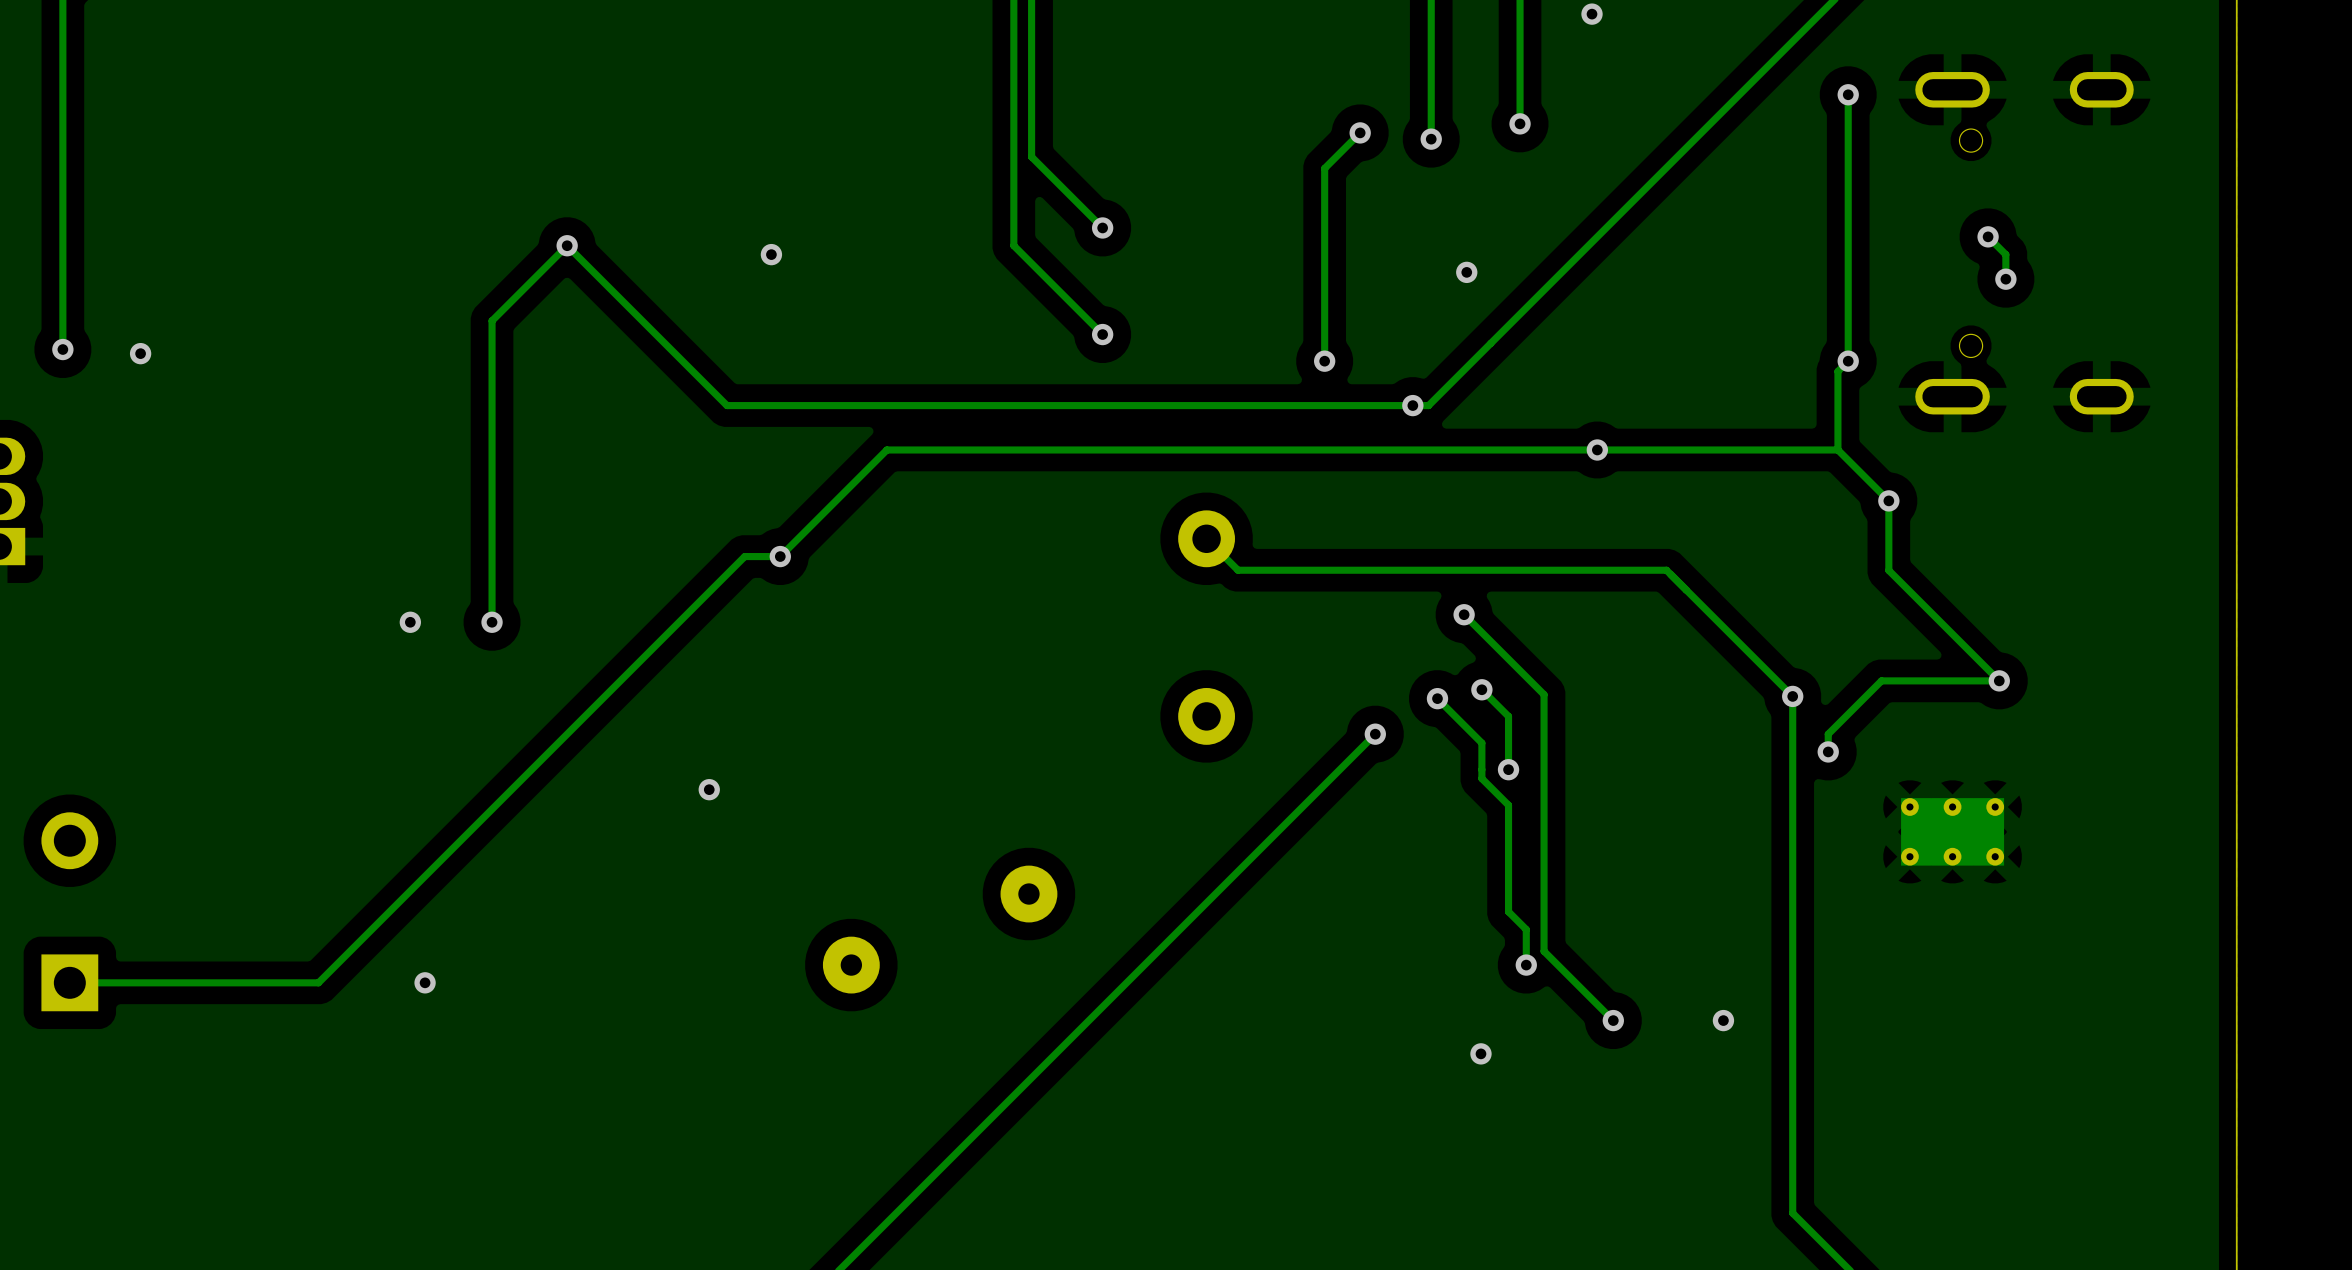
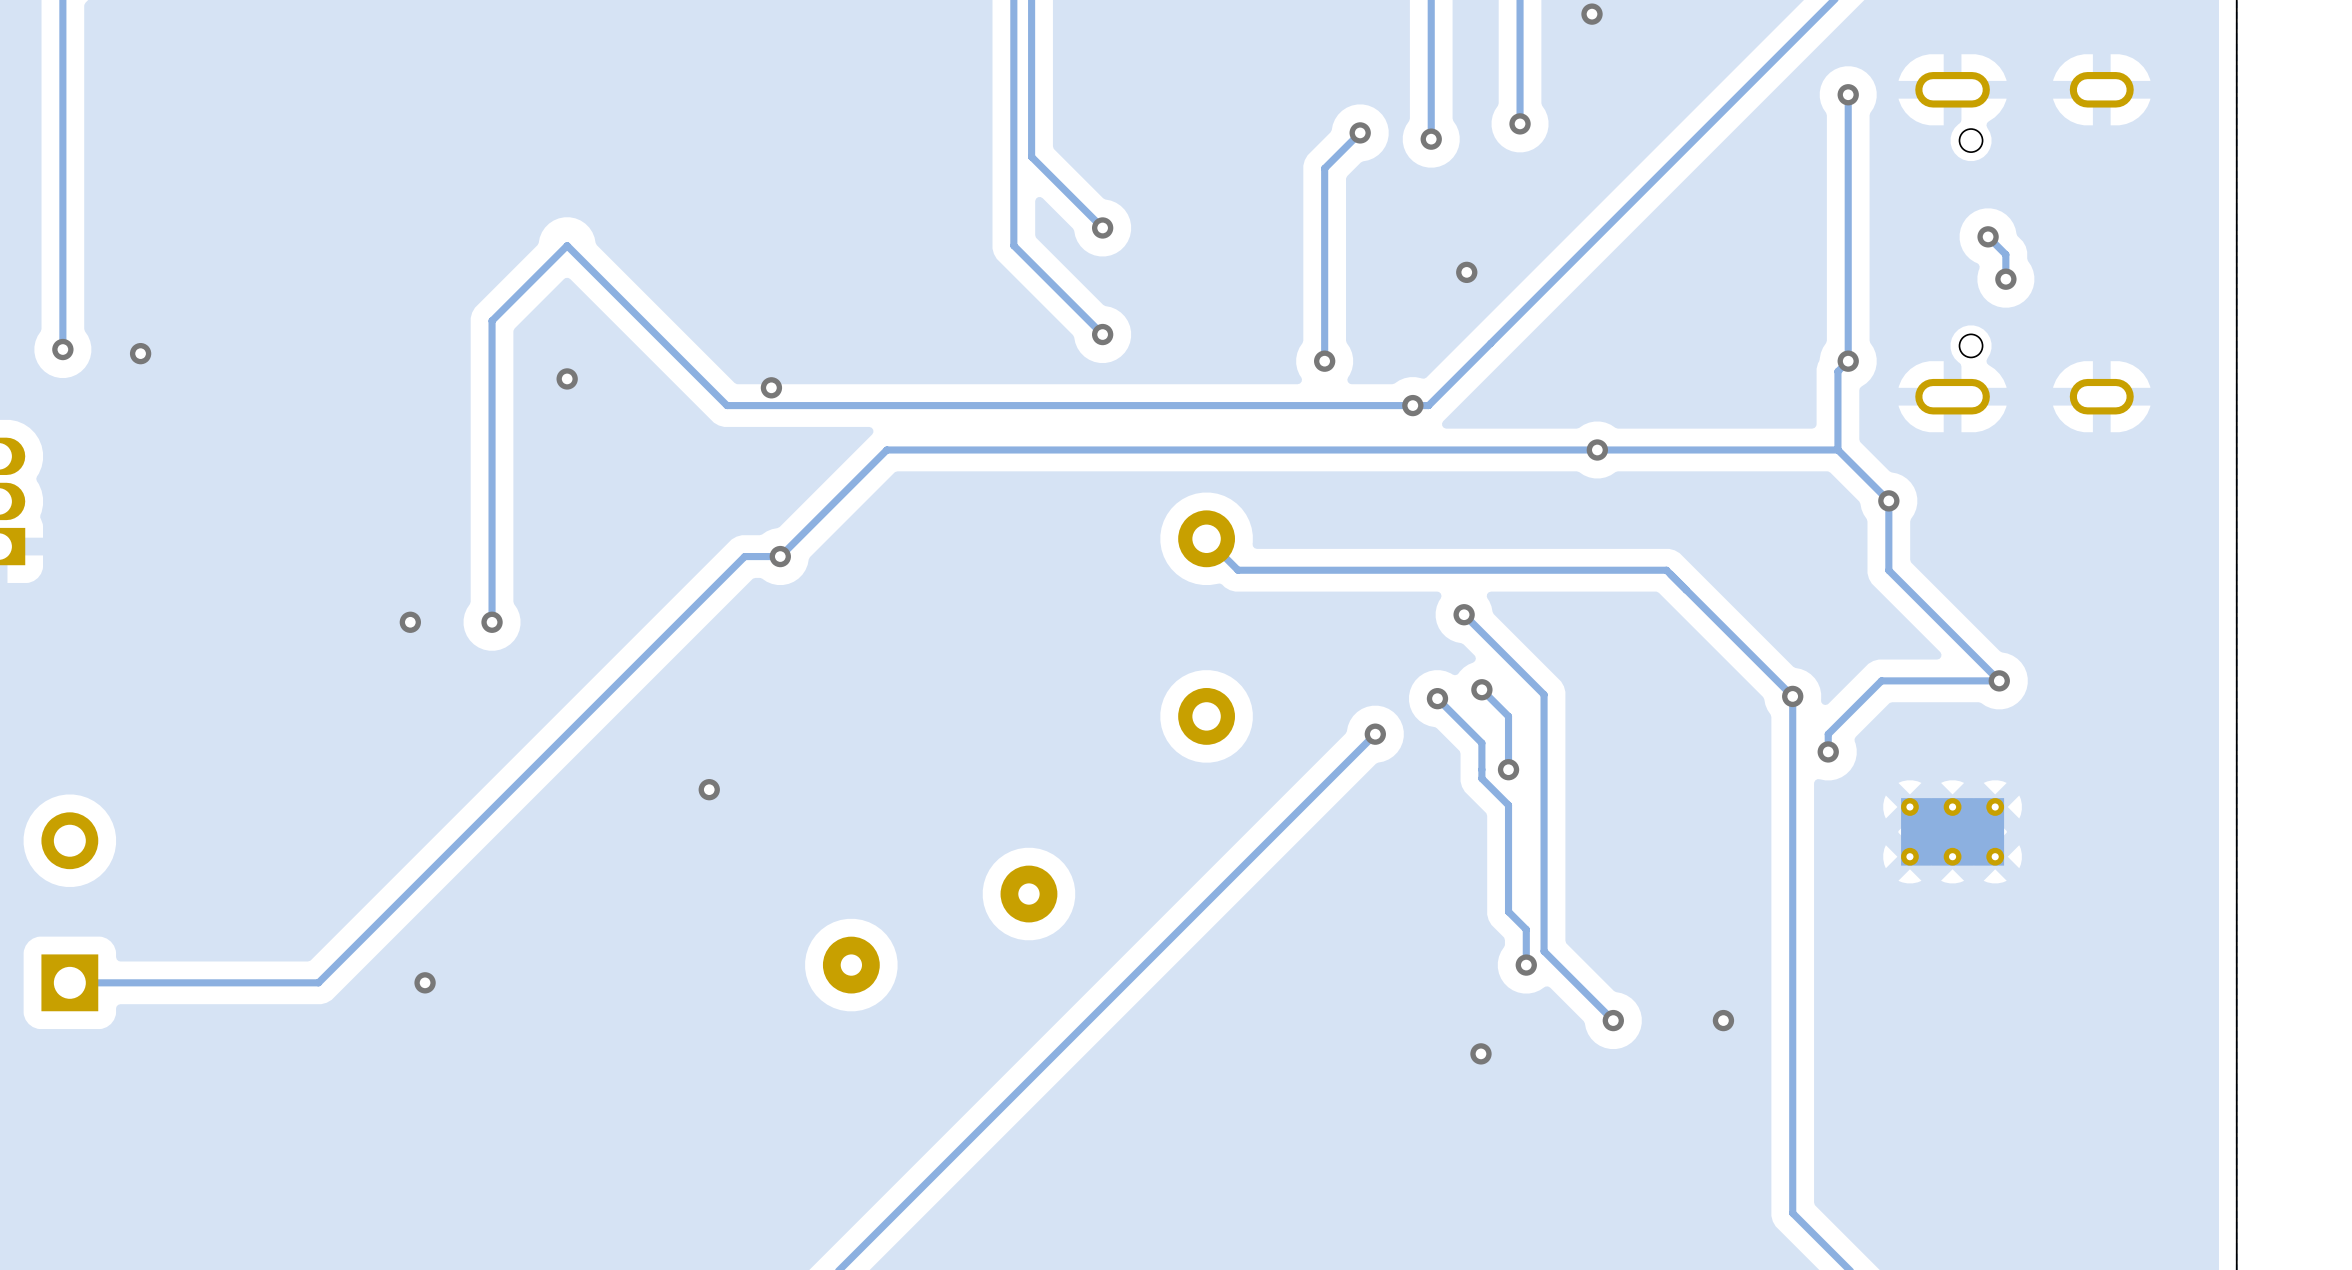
via: (567, 245) -> none
via: (771, 254) -> none
via: none -> (567, 378)
via: none -> (771, 387)

